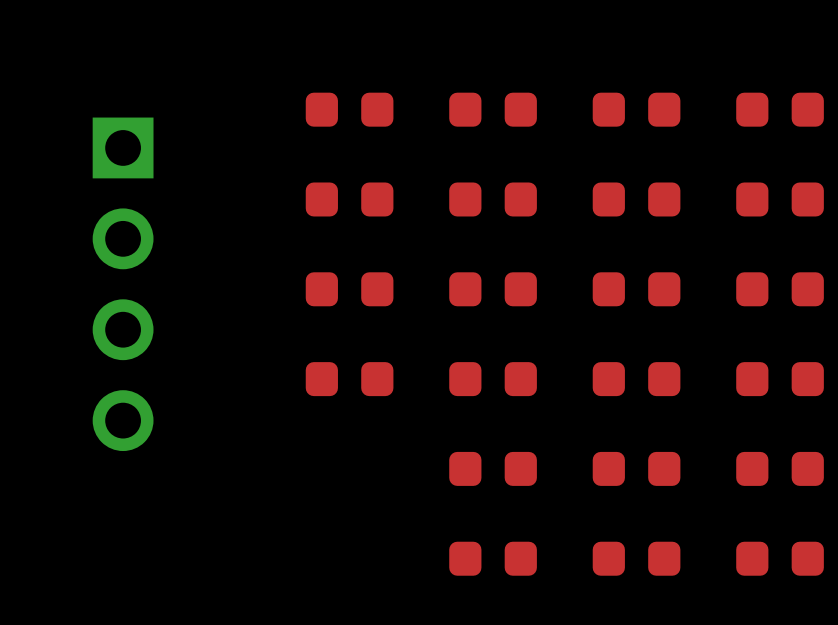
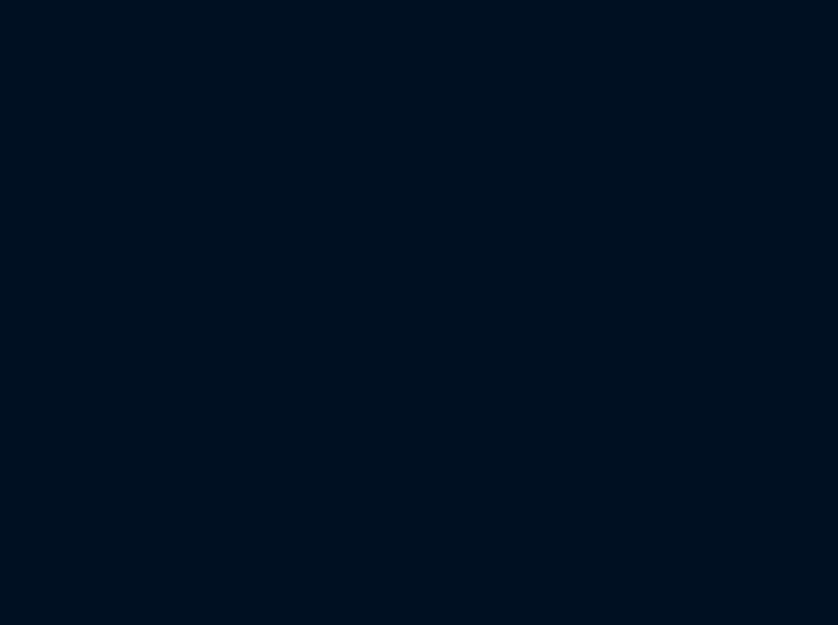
part: (349, 109) -> none
part: (493, 109) -> none
part: (636, 109) -> none
part: (780, 109) -> none
part: (349, 199) -> none
part: (493, 199) -> none
part: (636, 199) -> none
part: (780, 199) -> none
part: (123, 284) -> none
part: (349, 289) -> none
part: (493, 289) -> none
part: (636, 289) -> none
part: (780, 289) -> none
part: (349, 379) -> none
part: (493, 379) -> none
part: (636, 379) -> none
part: (780, 379) -> none
part: (493, 468) -> none
part: (636, 468) -> none
part: (780, 468) -> none
part: (493, 558) -> none
part: (636, 558) -> none
part: (780, 558) -> none

